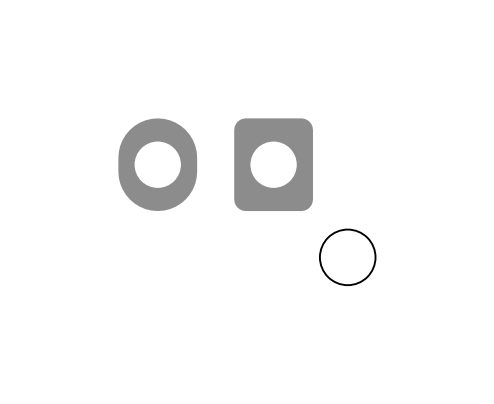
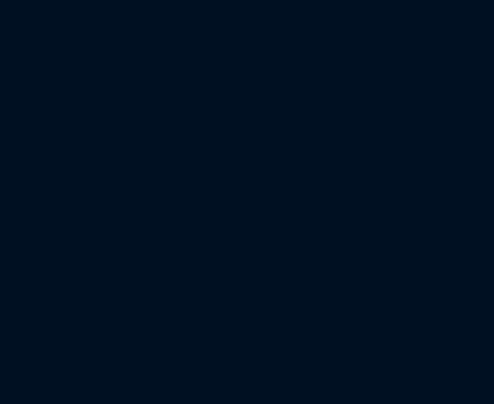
part: (246, 201) -> none

